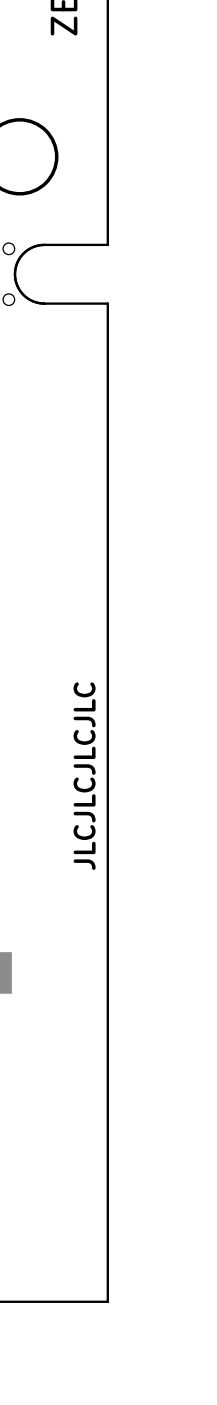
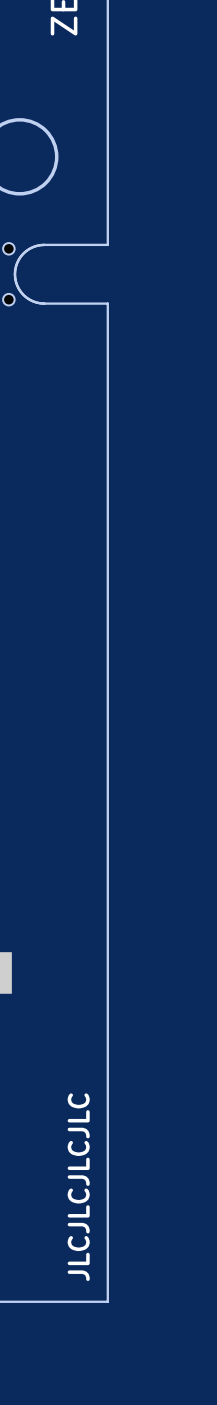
text position: JLCJLCJLCJLC (84, 776) -> JLCJLCJLCJLC (78, 1187)

